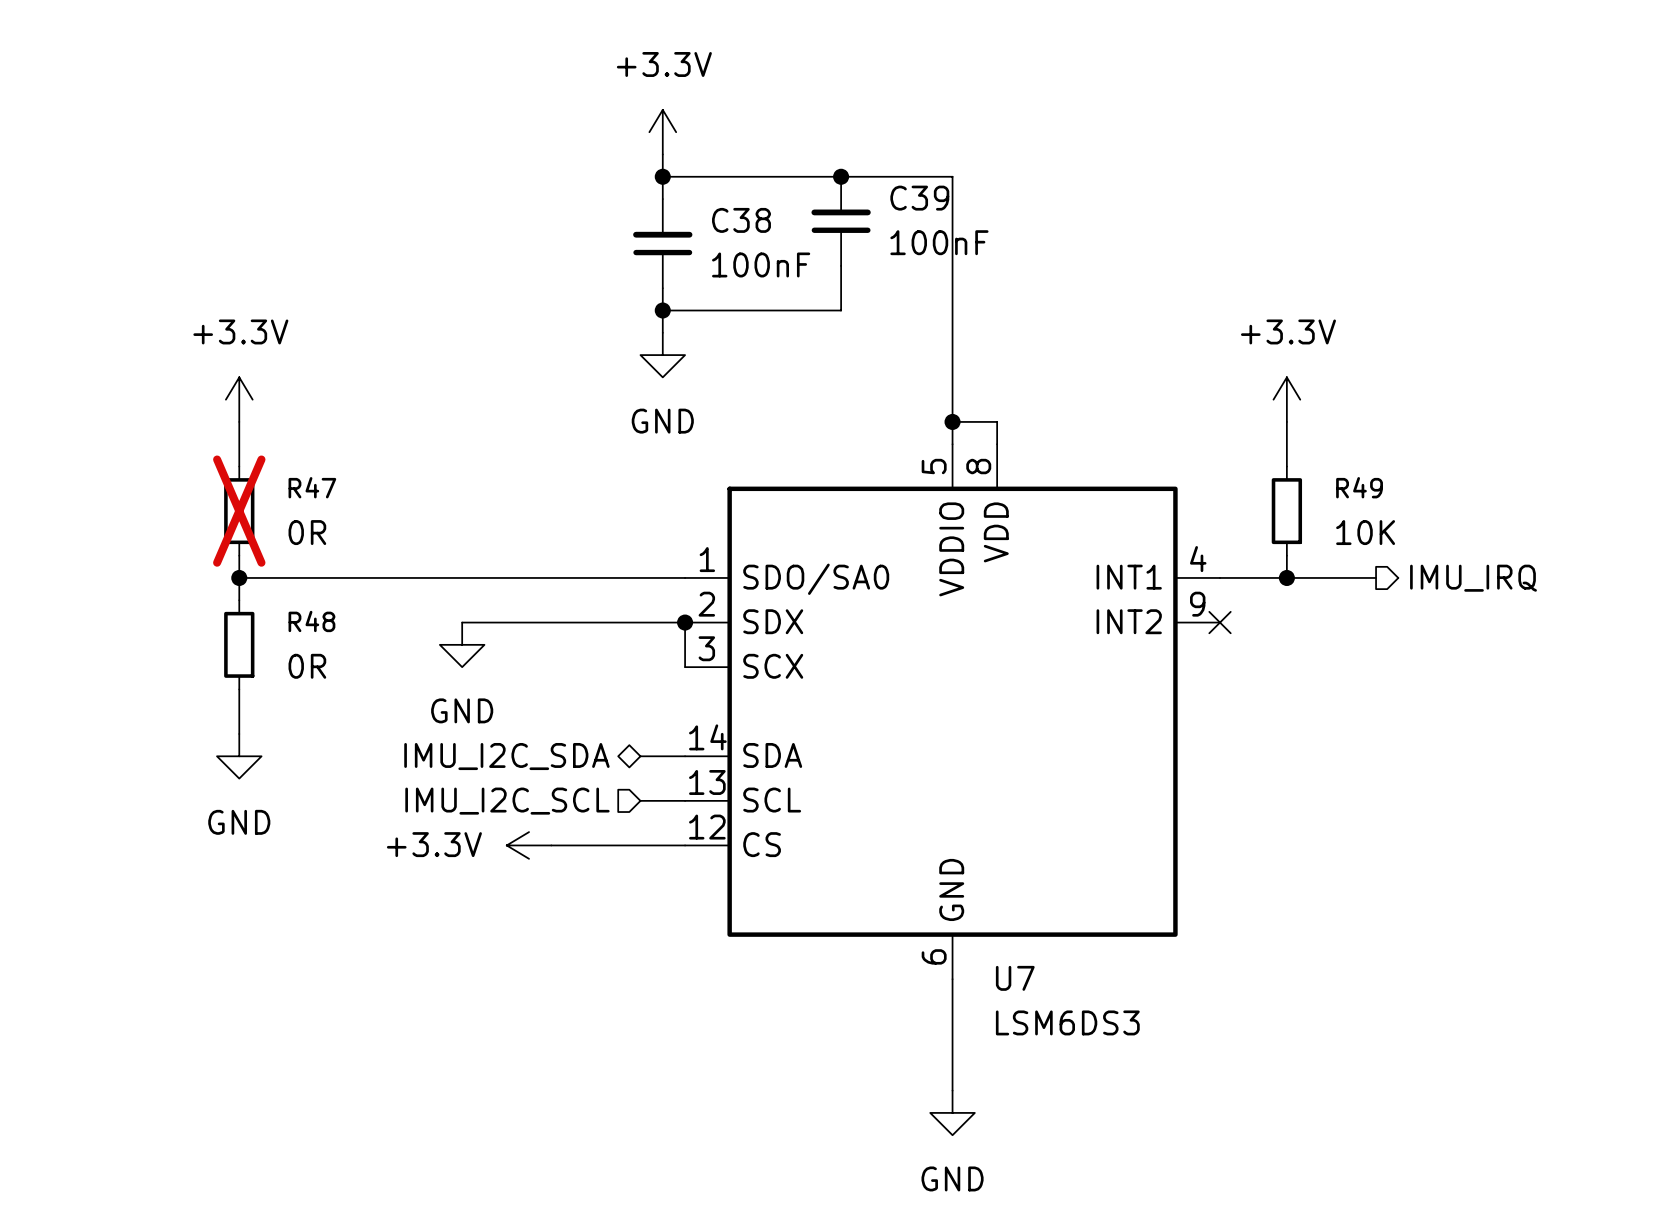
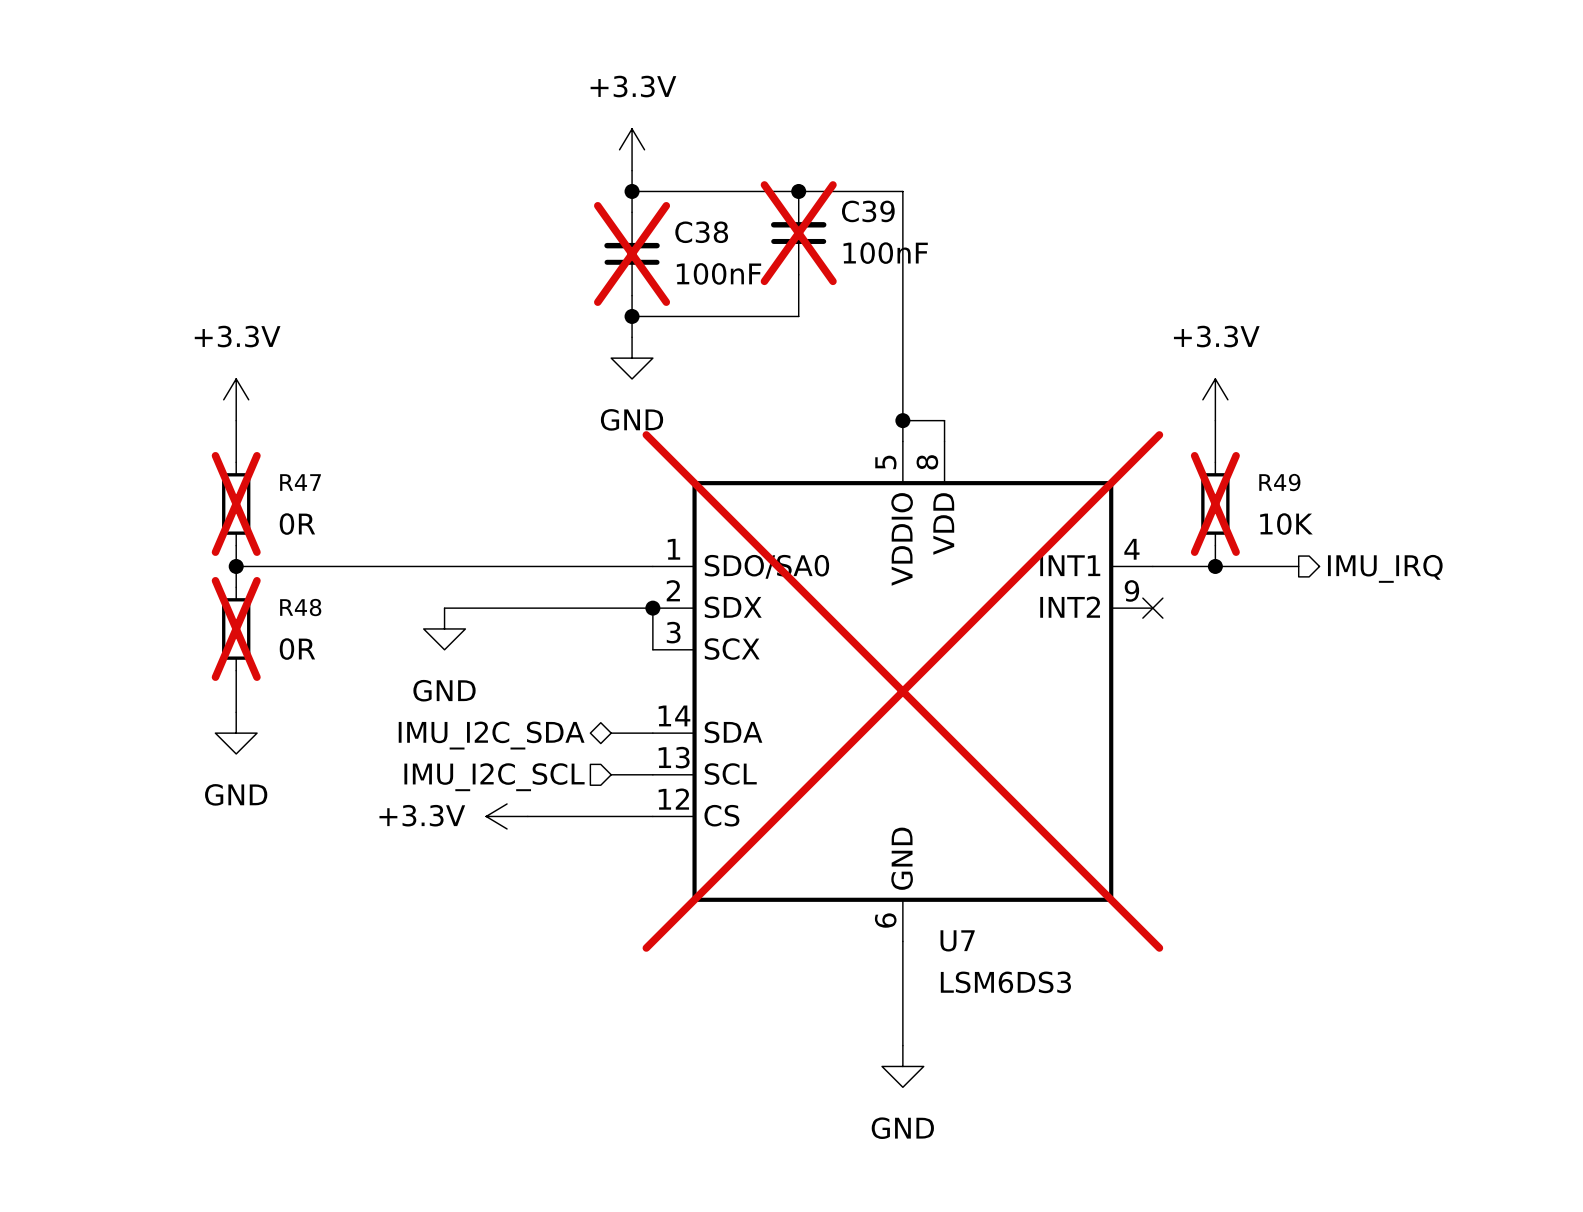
C39 do-not-place cross: none -> (798, 233)
C38 do-not-place cross: none -> (632, 253)
R49 do-not-place cross: none -> (1215, 503)
R48 do-not-place cross: none -> (236, 628)
U7 do-not-place cross: none -> (902, 691)

